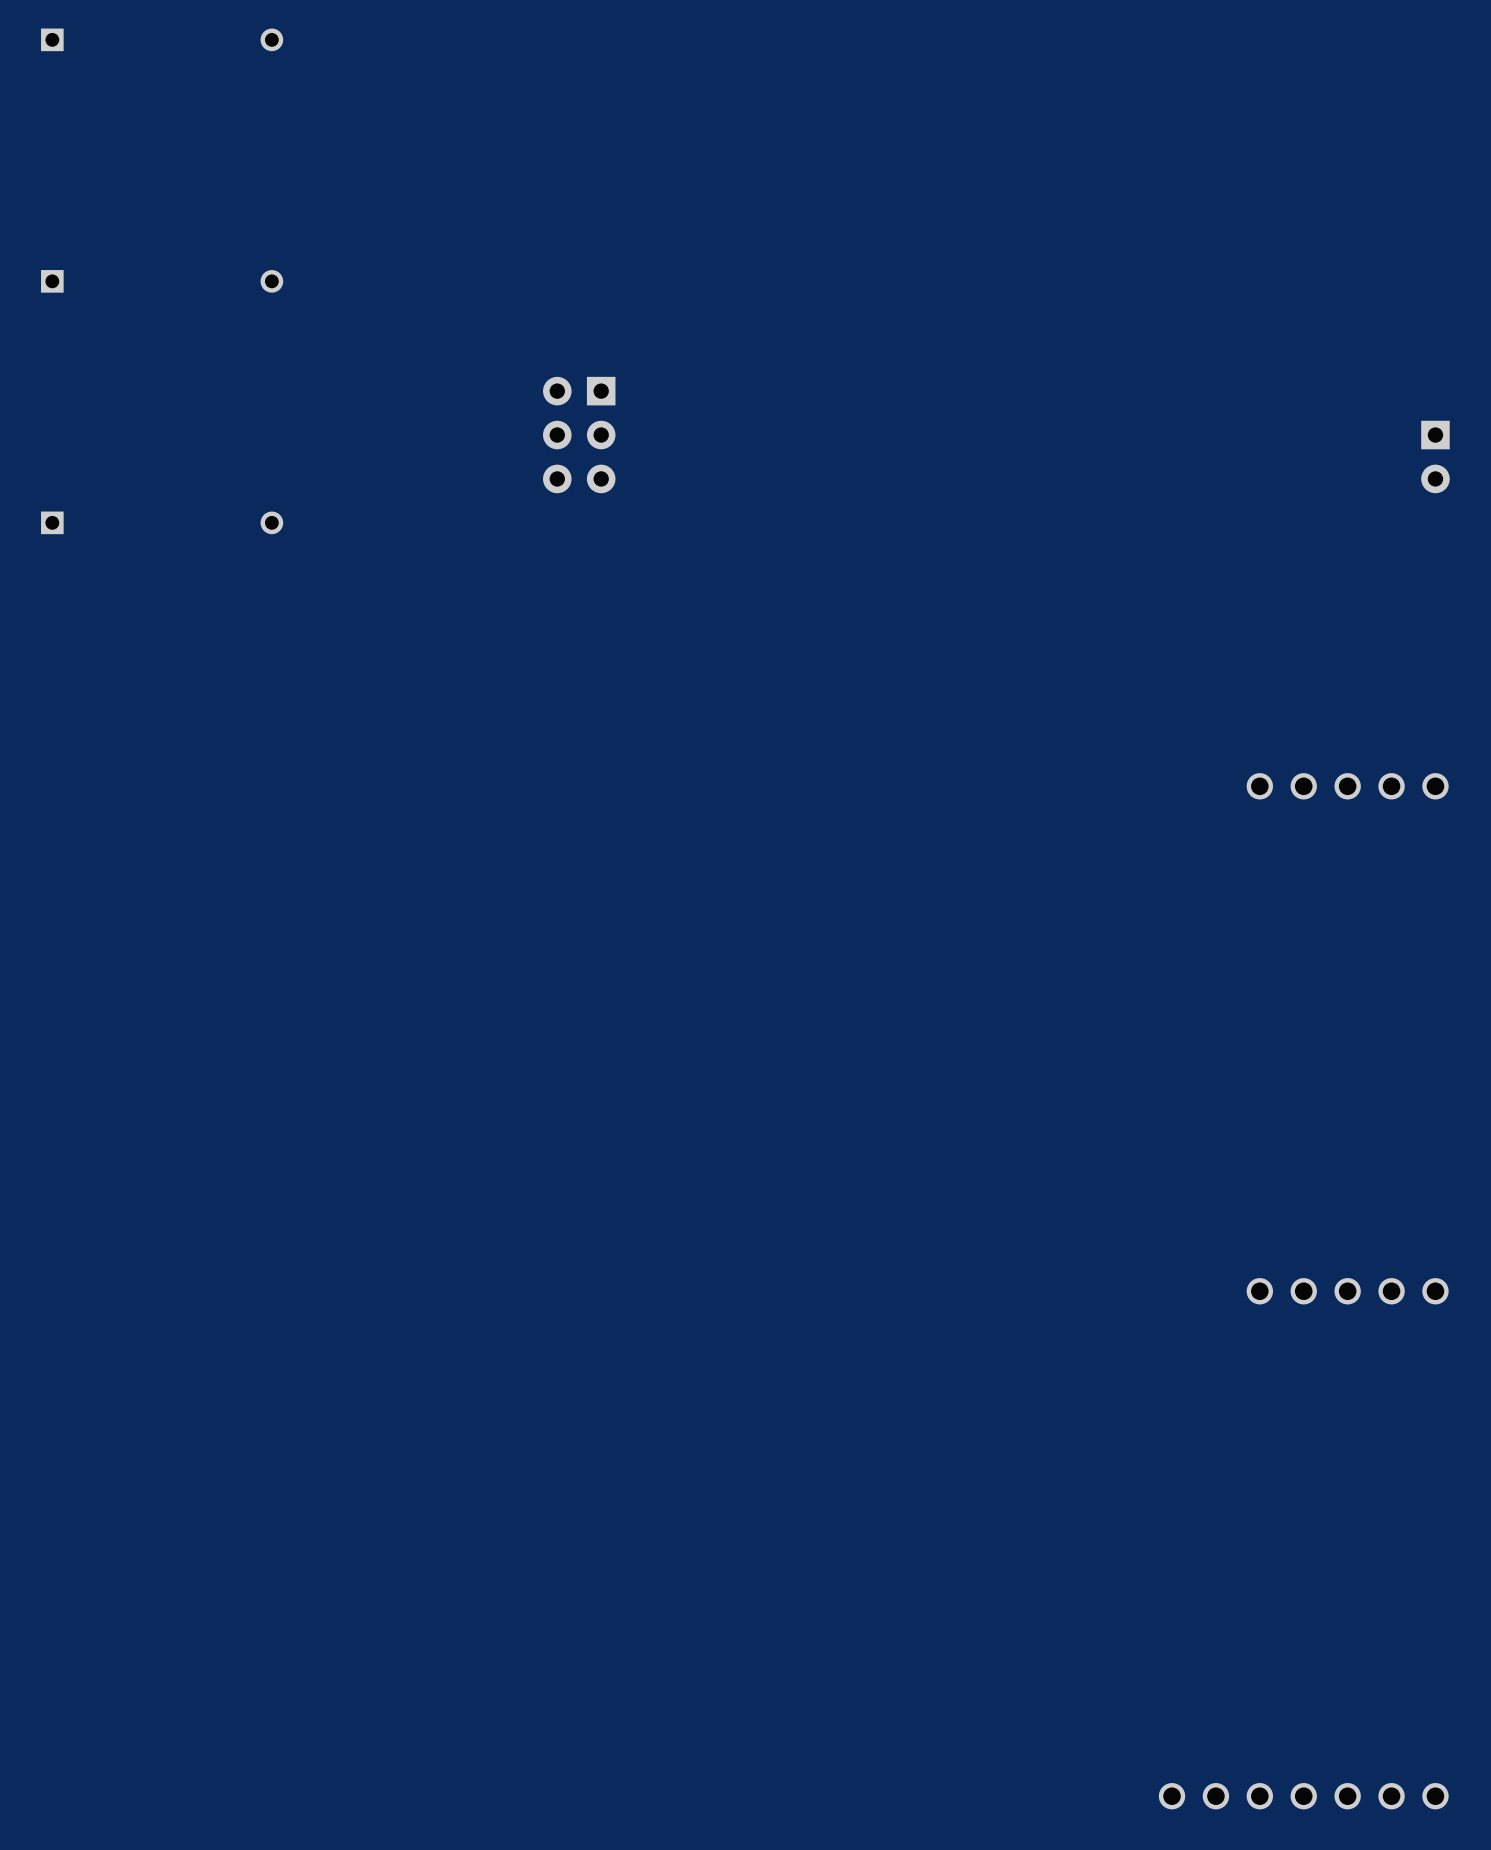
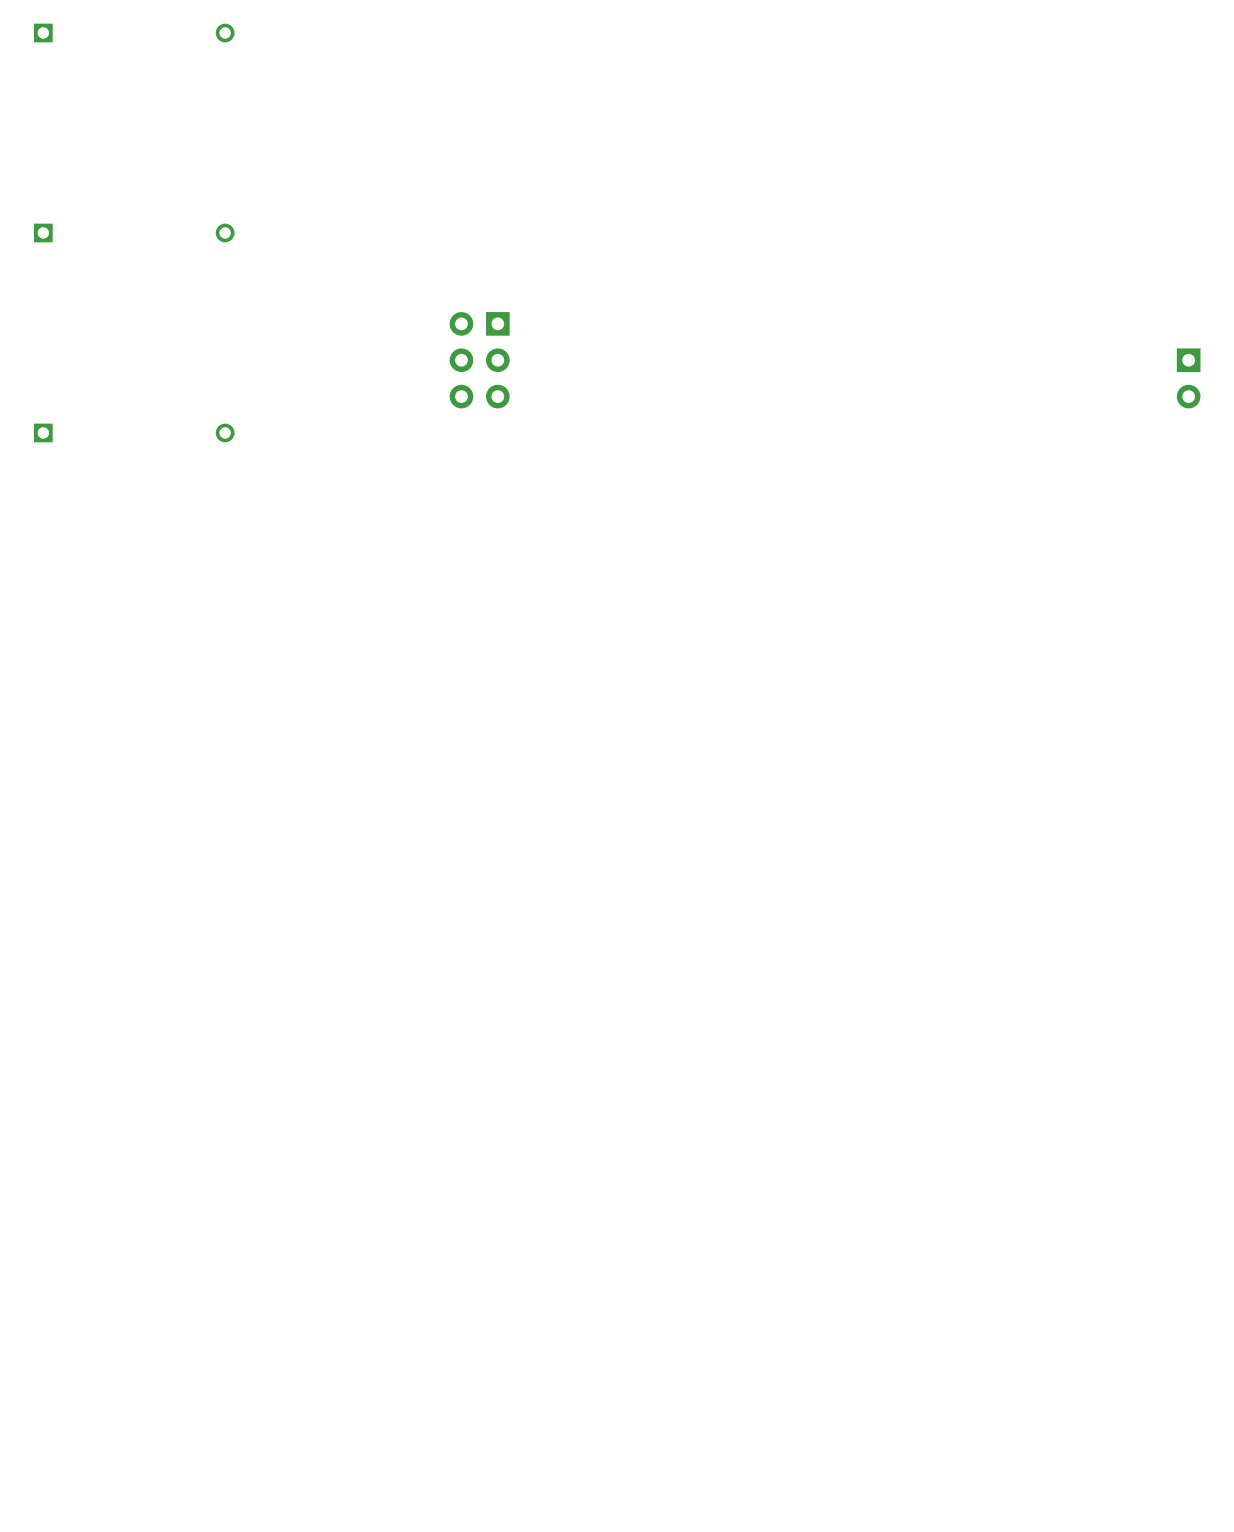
part: (1347, 786) -> none
part: (1347, 1291) -> none
part: (1303, 1796) -> none

